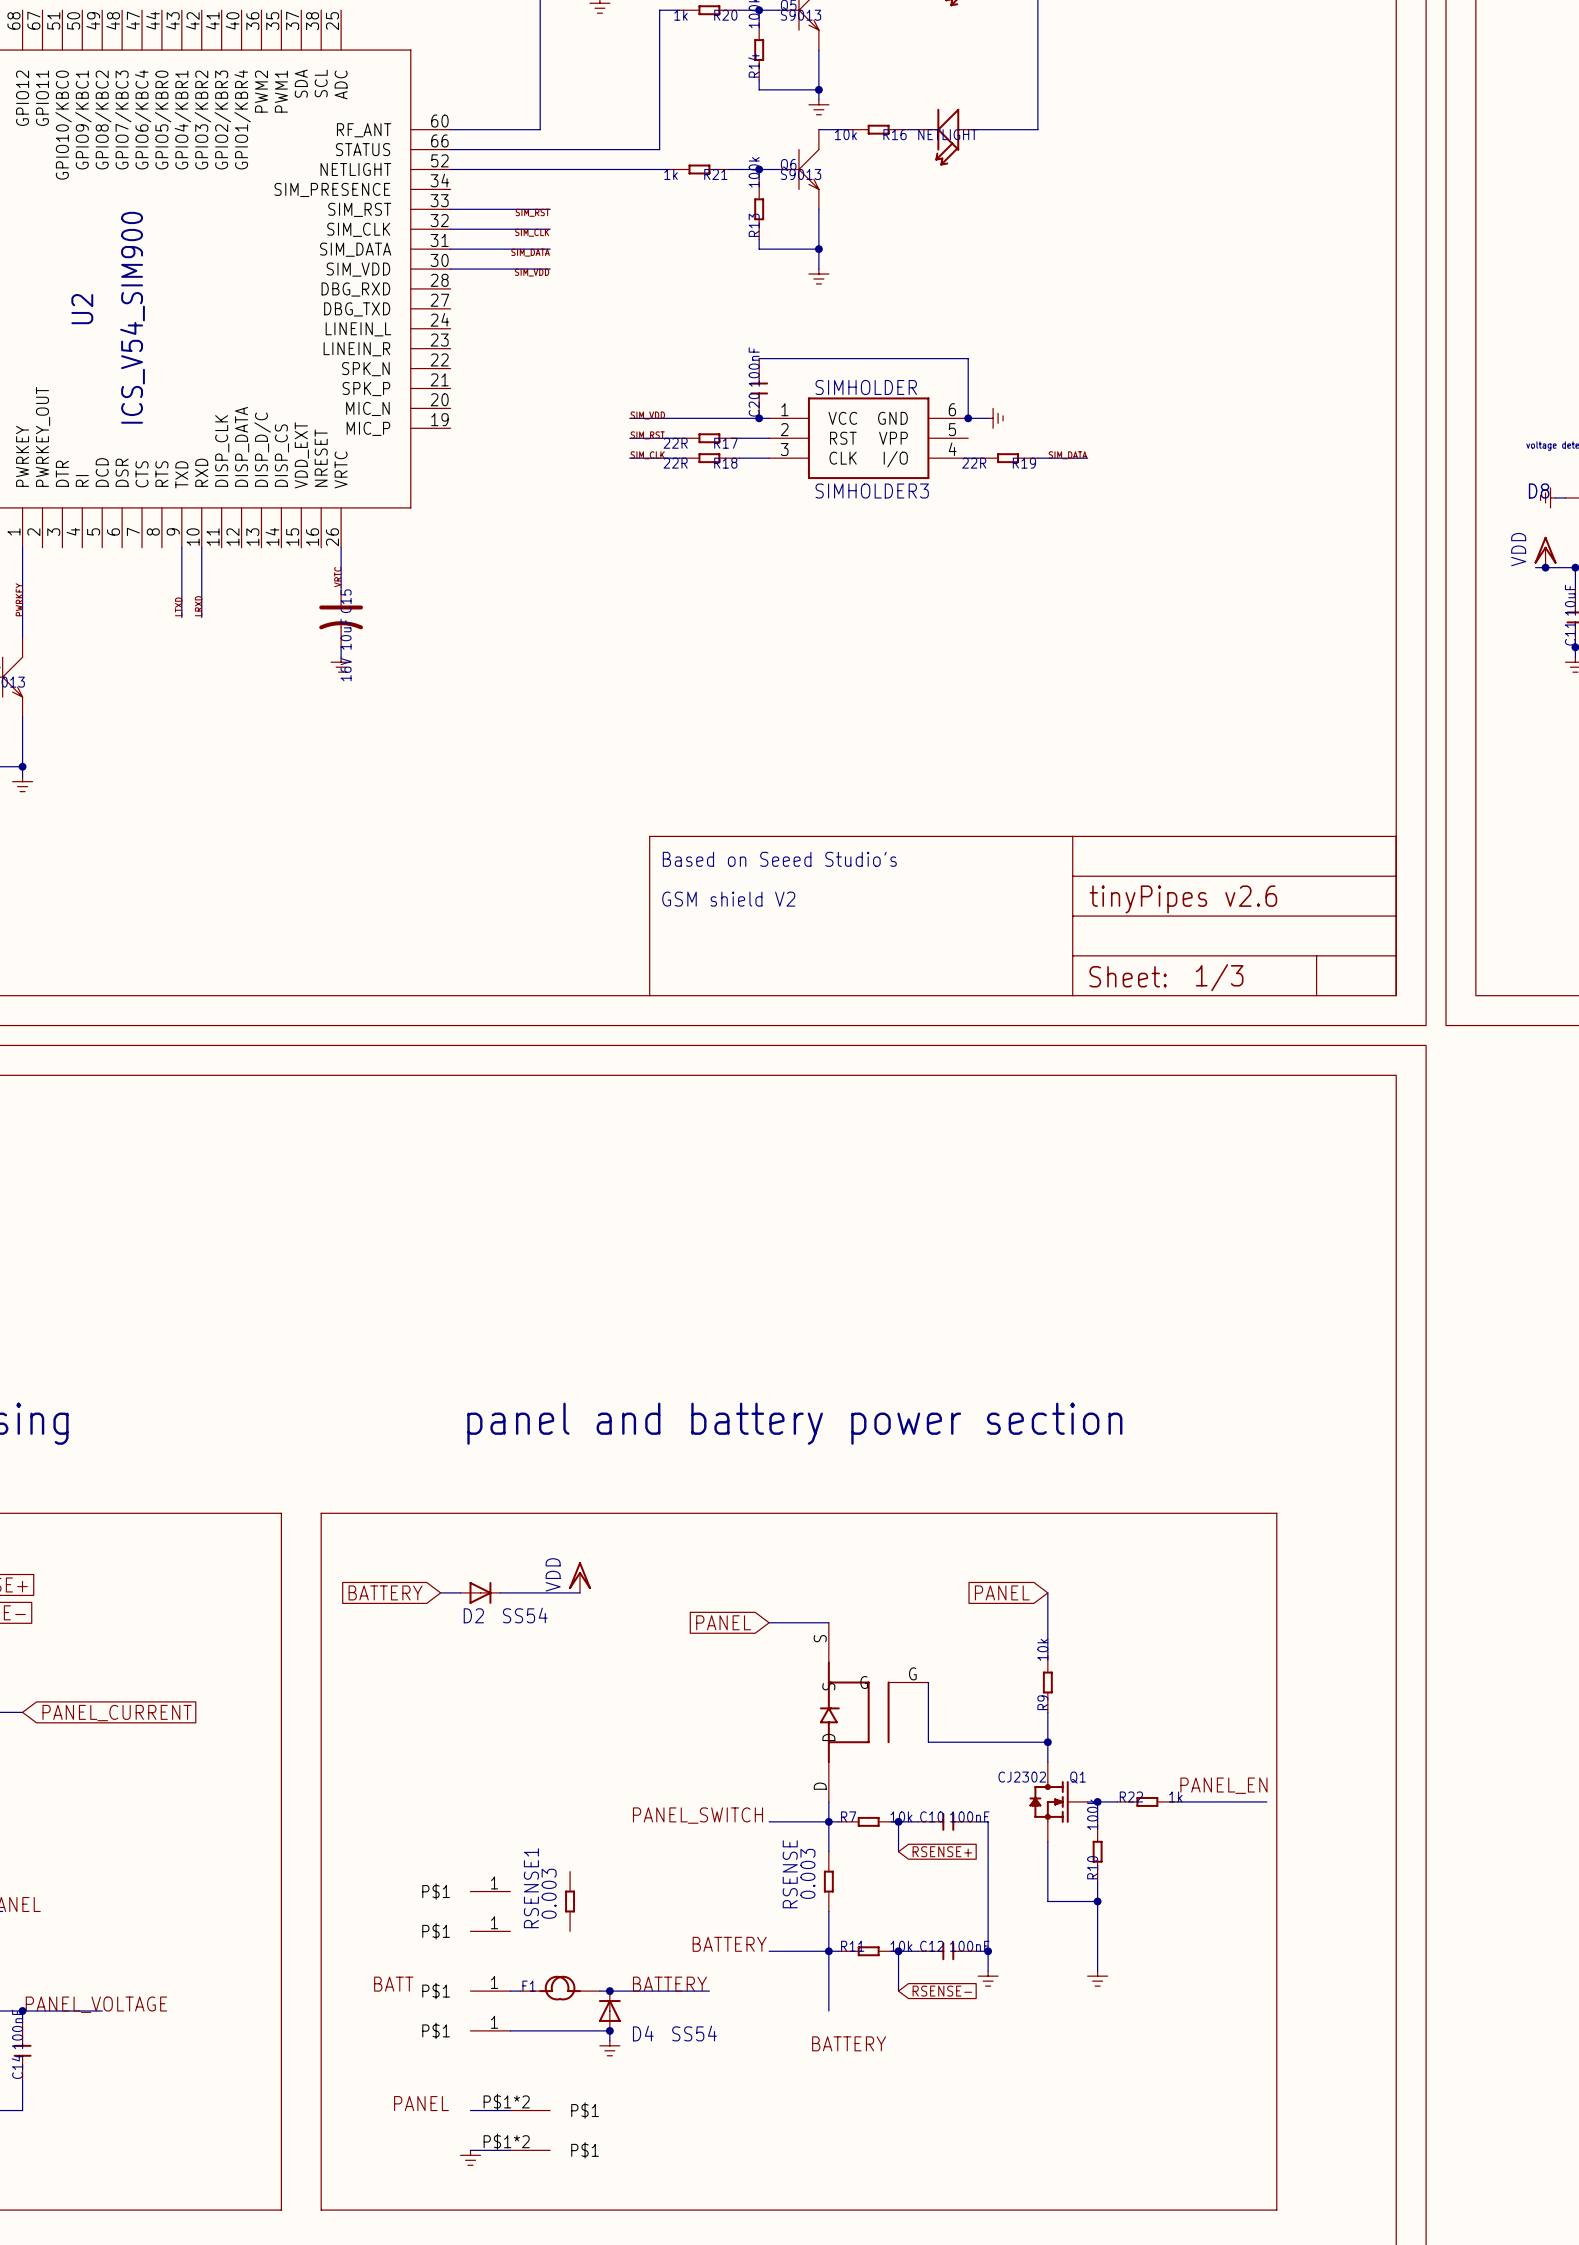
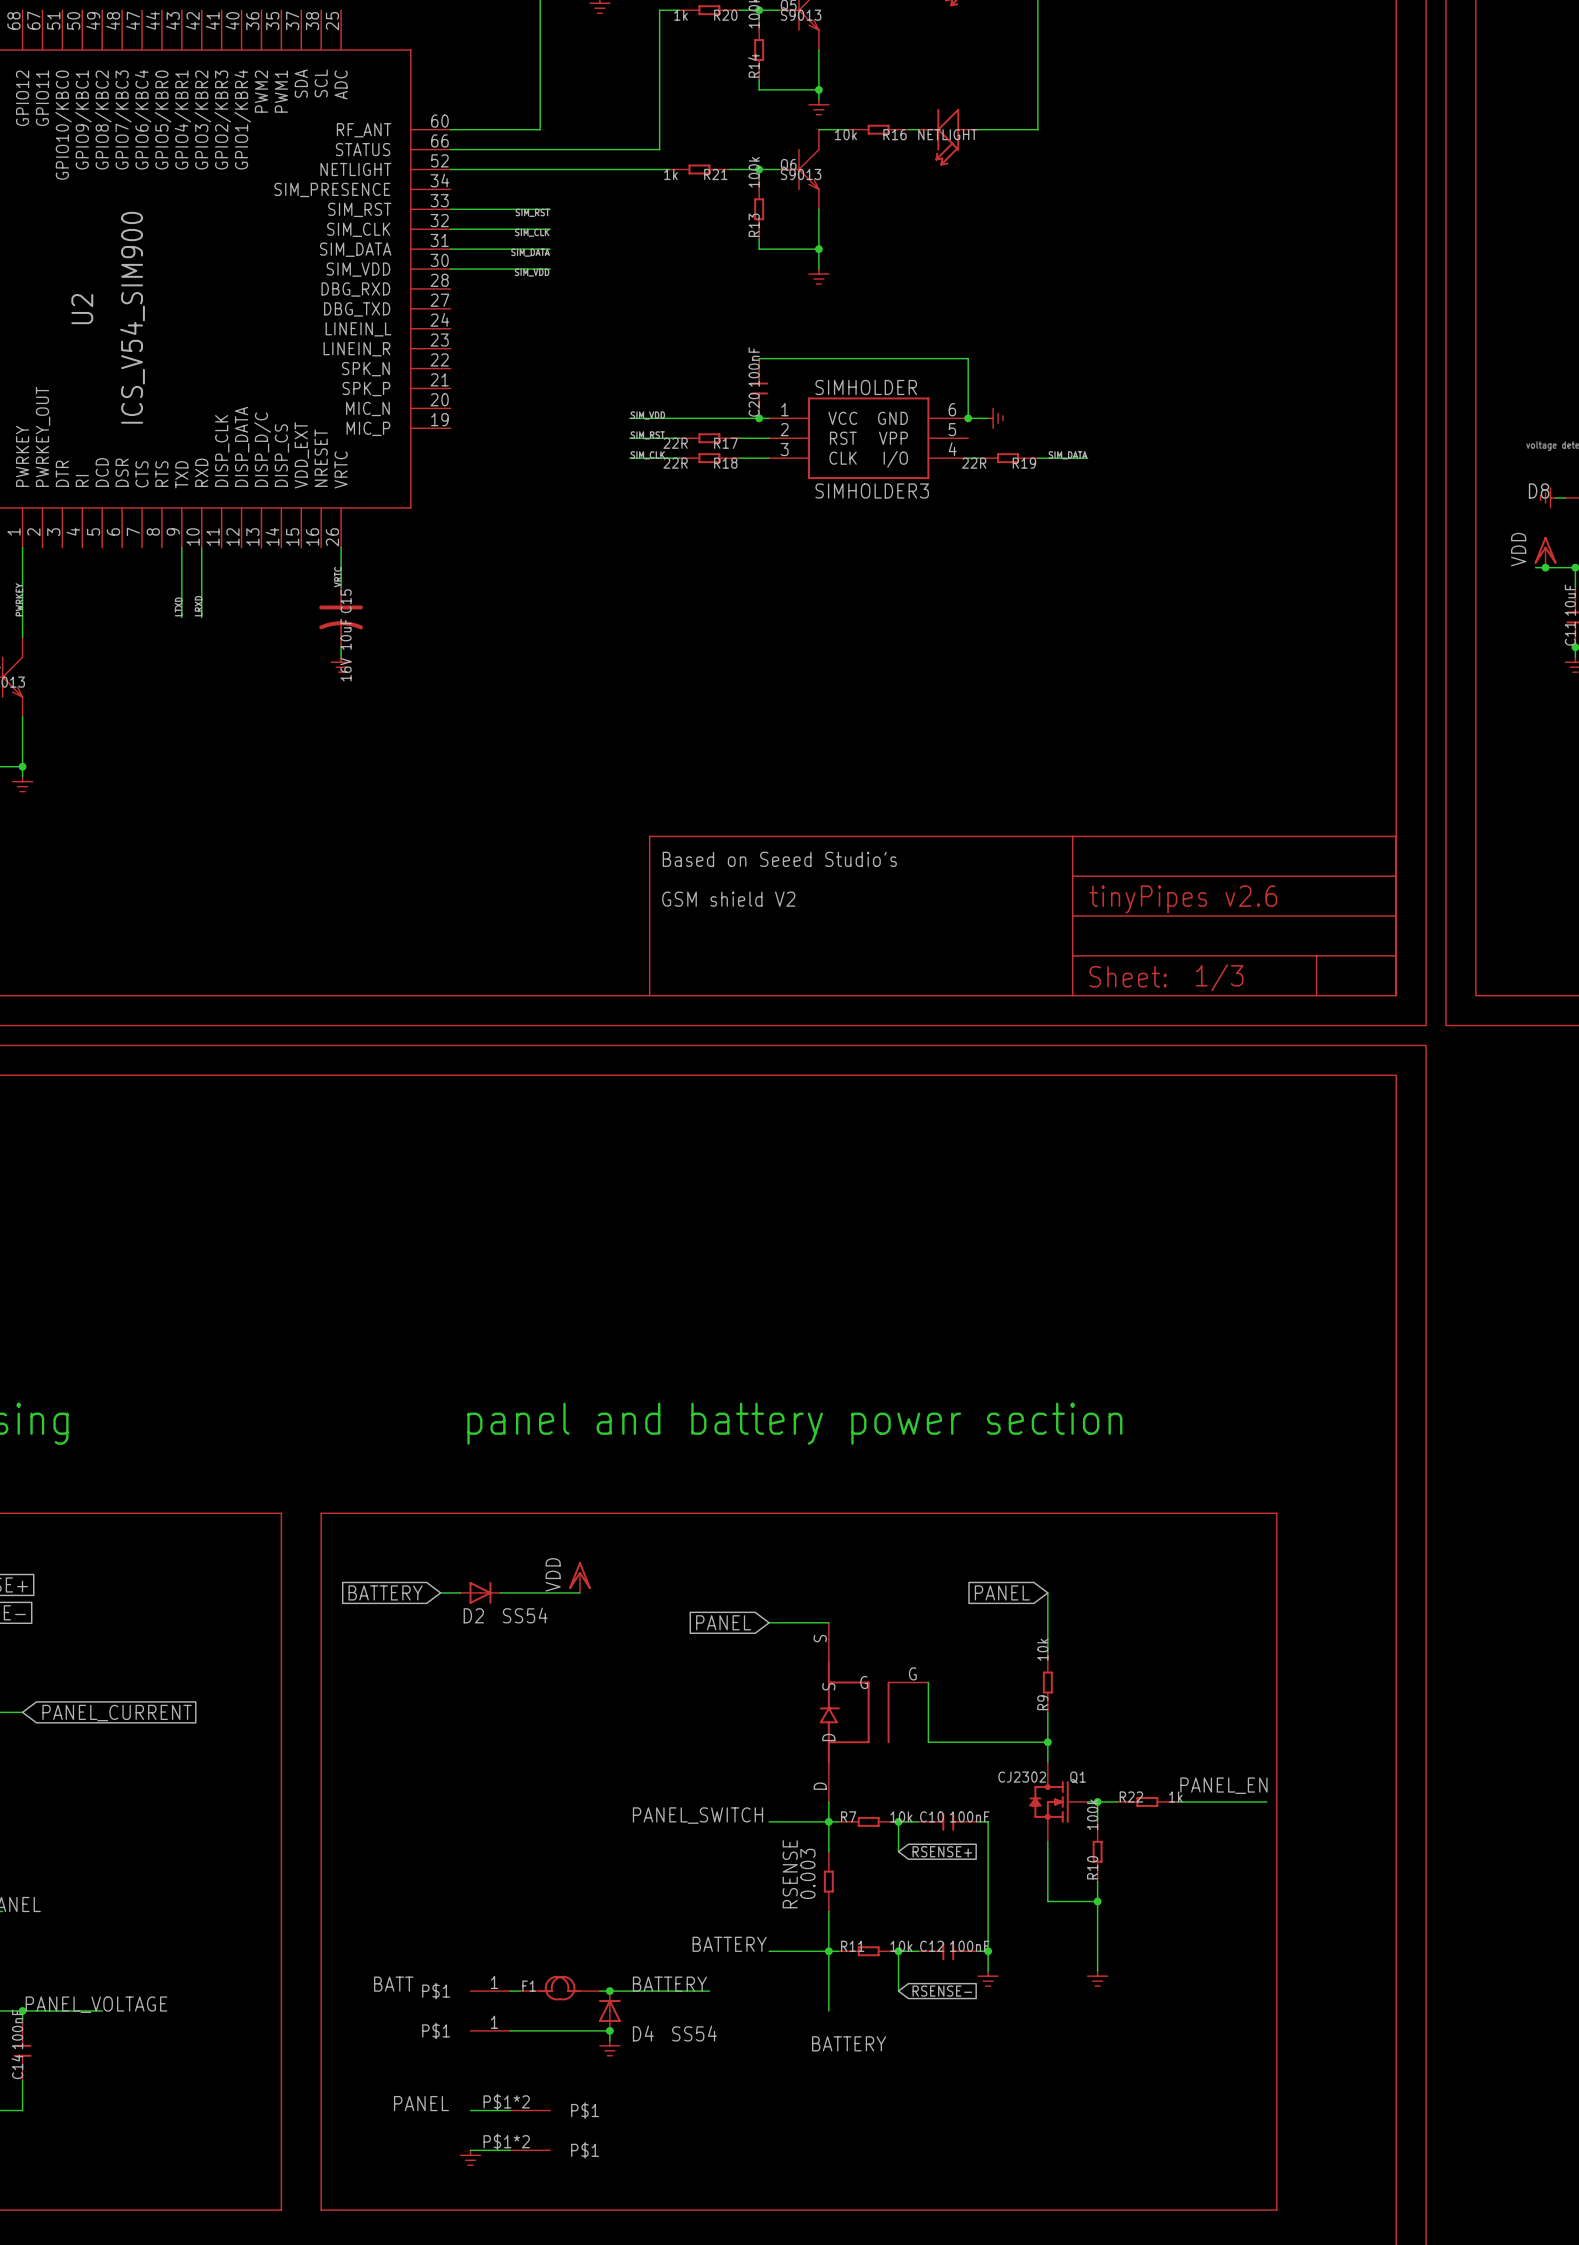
part: (490, 1891) -> none
RSENSE1: 0.003 (570, 1901) -> none
part: (490, 1931) -> none

